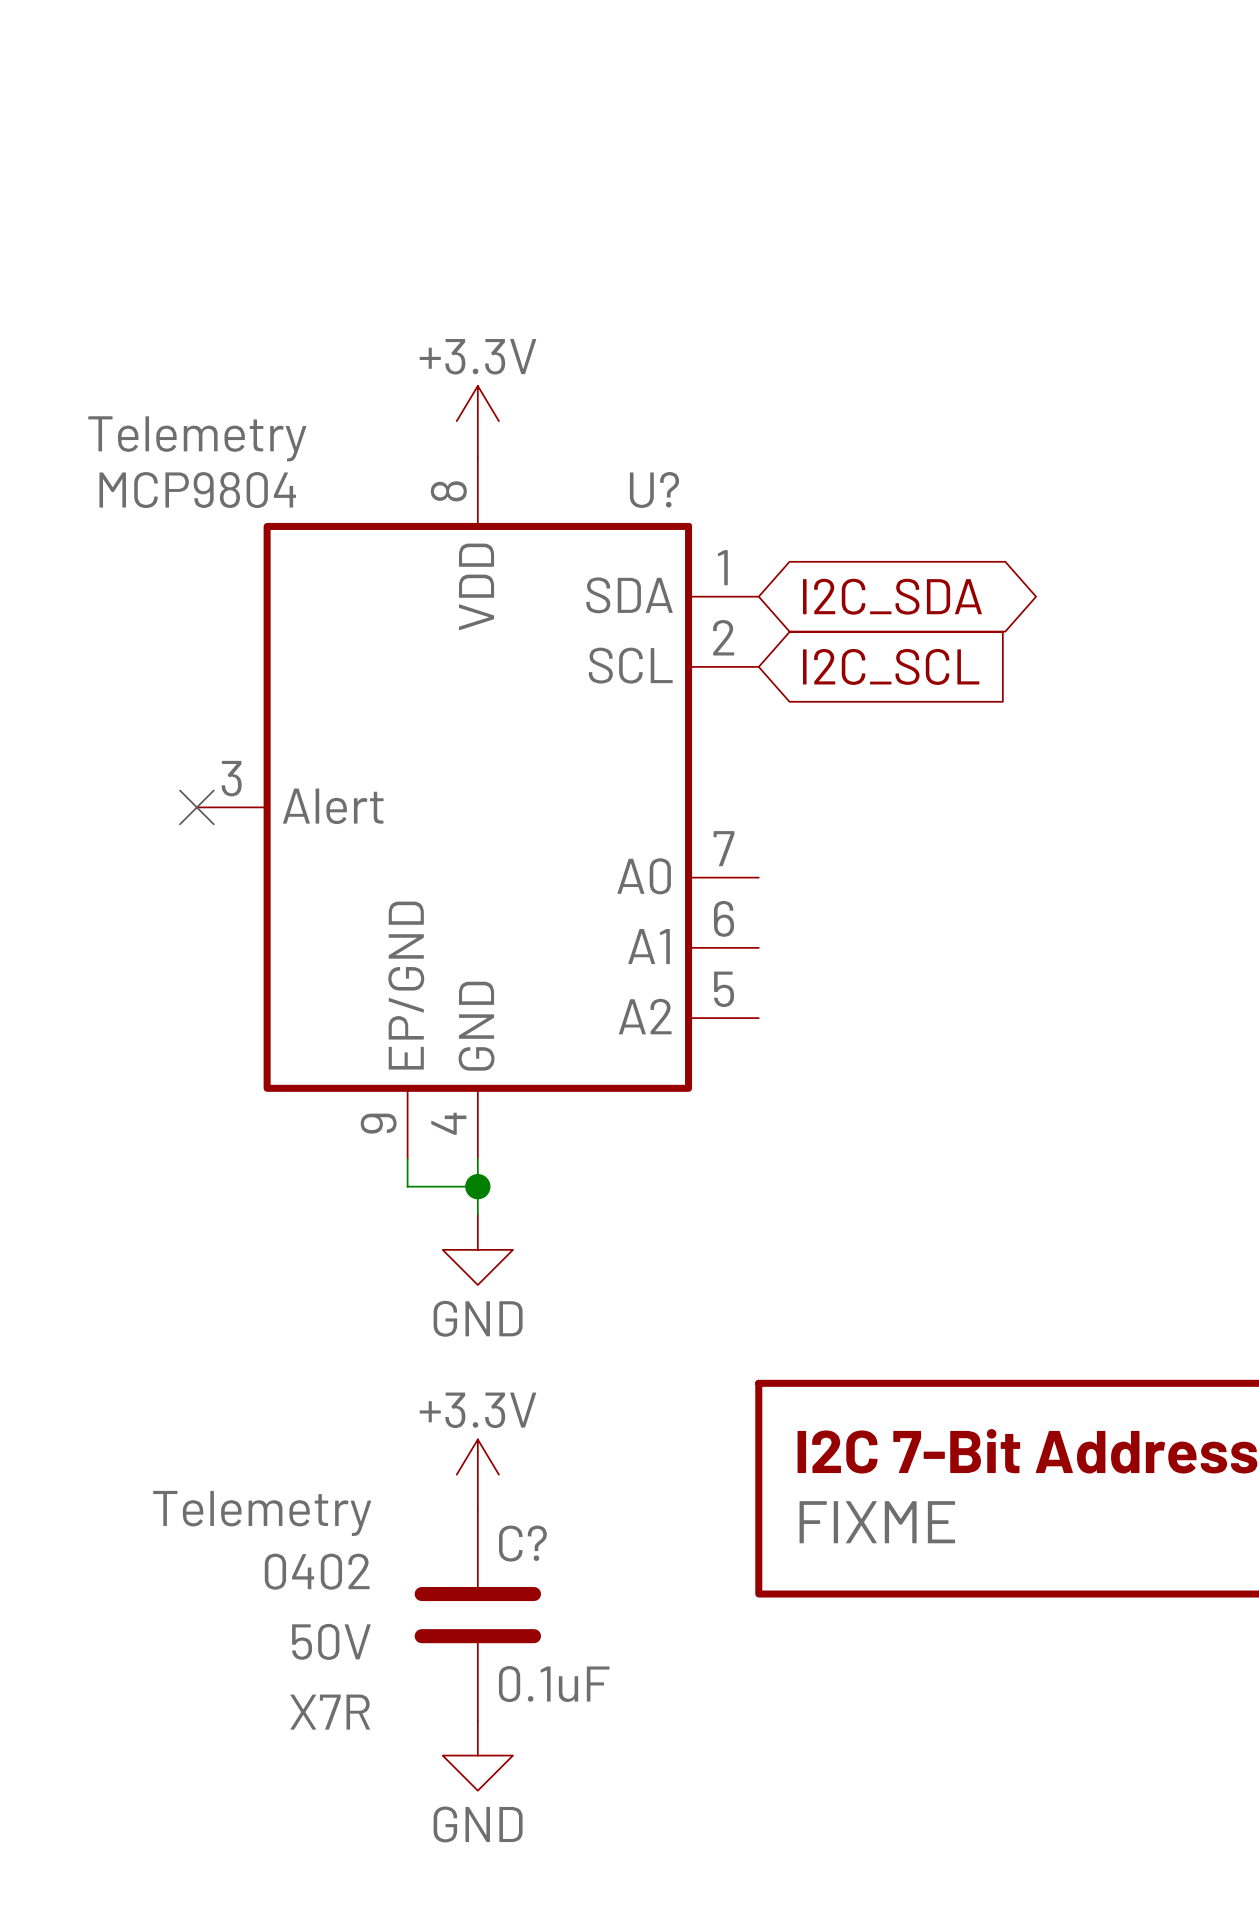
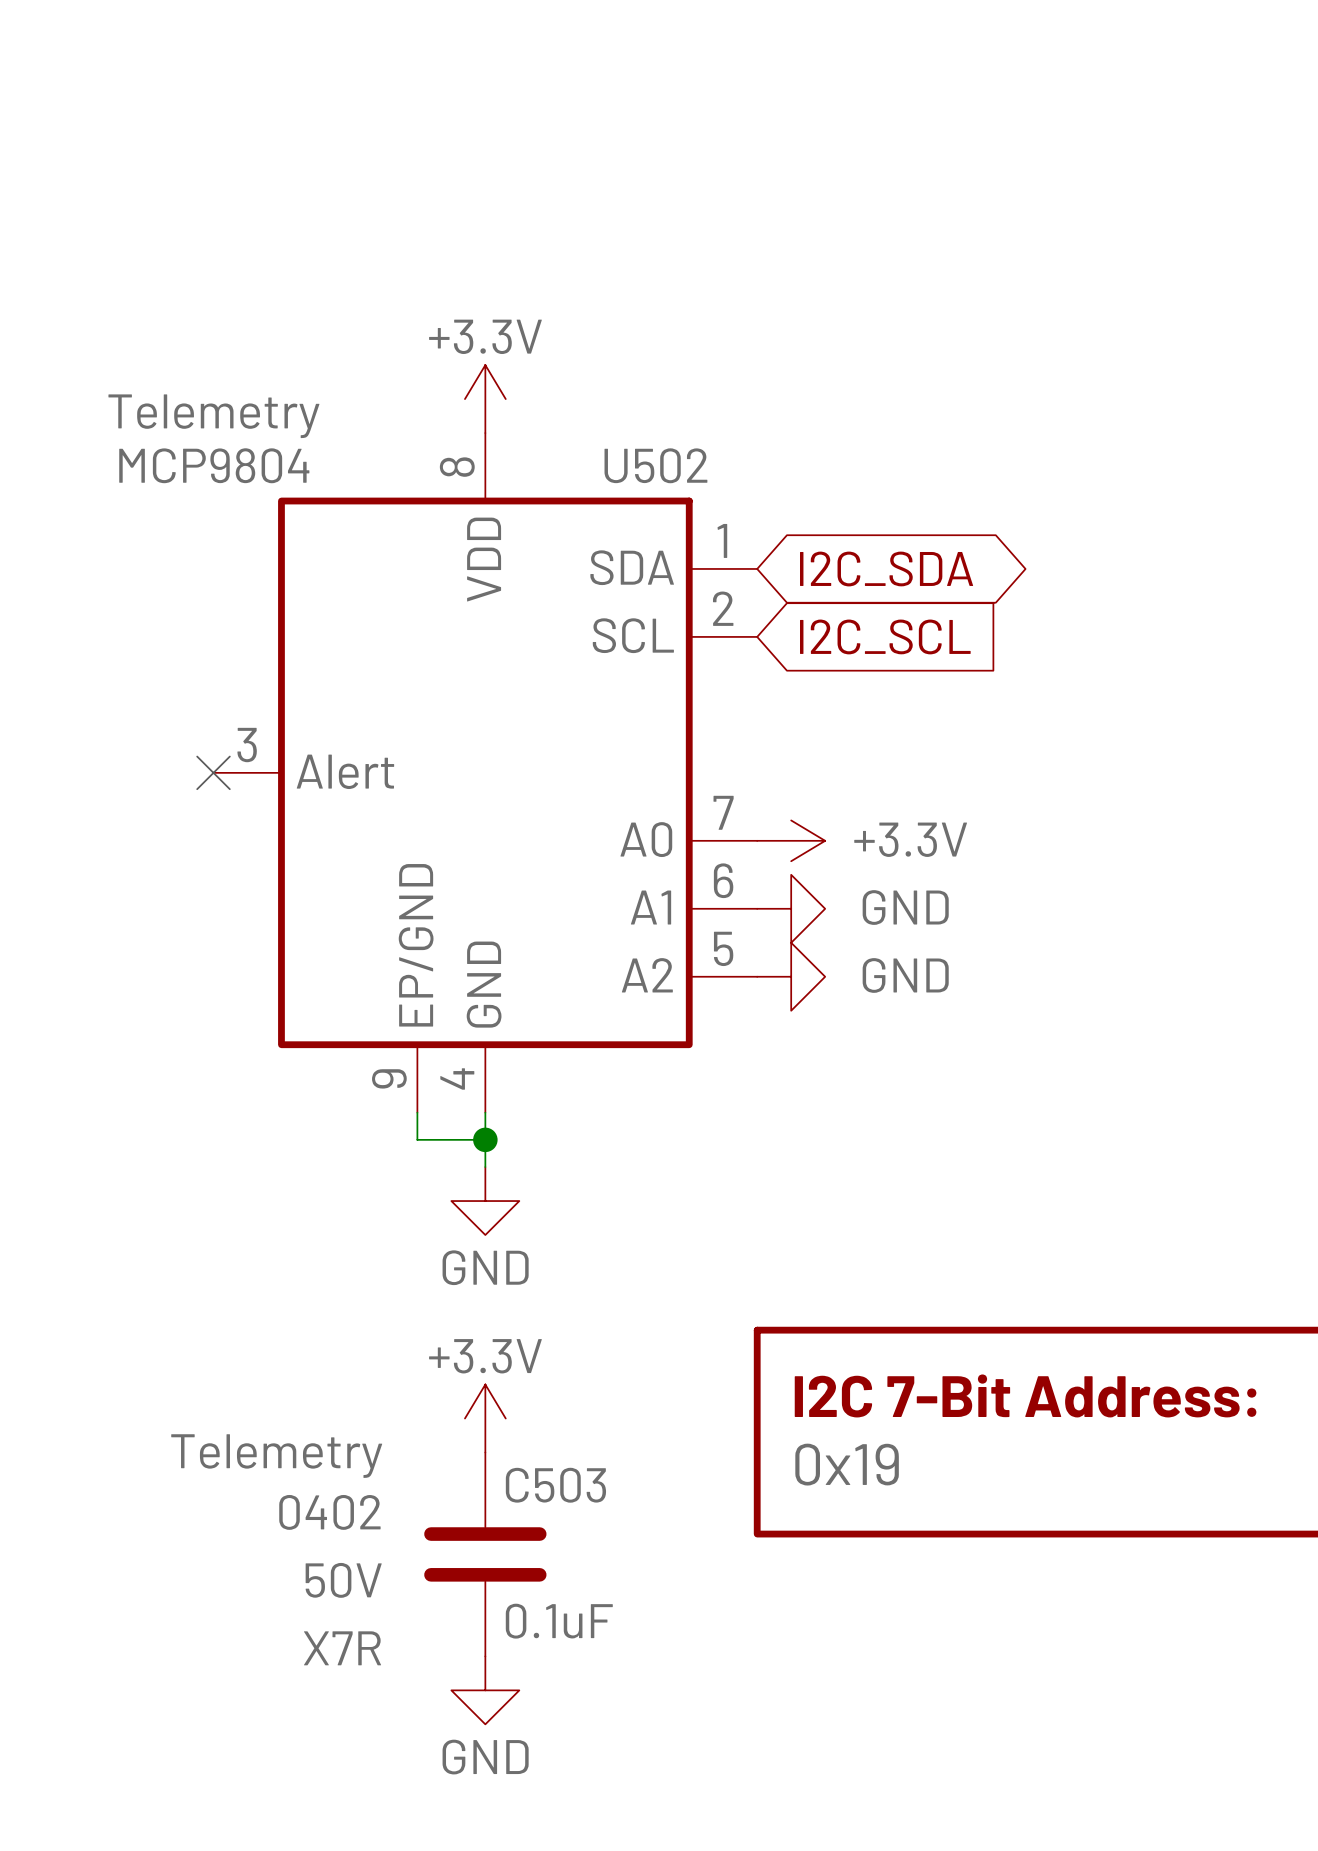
U? name: U? (654, 489) -> U502 (655, 465)
power symbol: none -> +3.3V (791, 840)
power symbol: none -> GND (791, 908)
power symbol: none -> GND (791, 976)
part value: FIXME (877, 1522) -> 0x19 (847, 1464)
C? name: C? (522, 1543) -> C503 (555, 1485)

